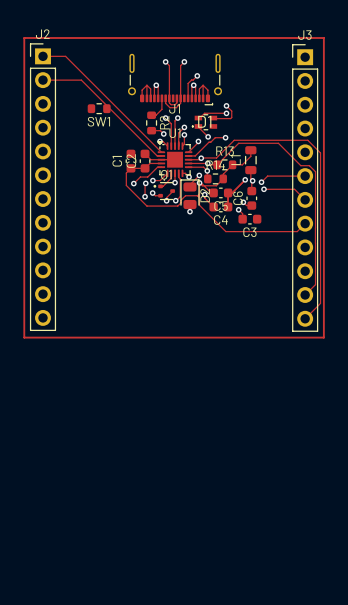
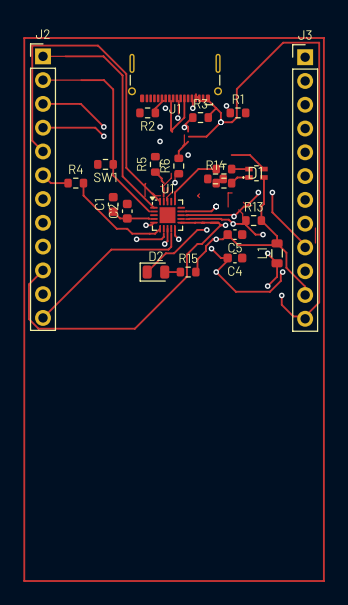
track: (65, 56) (161, 152) -> (65, 56) (103, 56) (122, 75) (122, 176) (153, 207)
track: (165, 61) (169, 65) (169, 102) (175, 104) (176, 98) -> none
via: (165, 61) -> none
track: (184, 61) (180, 65) (180, 103) (176, 107) (169, 107) (165, 103) (165, 98) -> none
via: (184, 61) -> none
track: (197, 75) (188, 83) (188, 98) -> none
via: (197, 75) -> none
track: (81, 80) (157, 155) (161, 155) -> (81, 80) (103, 80) (113, 89) (113, 175) (149, 211)
track: (146, 85) (142, 90) (142, 98) -> none
track: (146, 85) (150, 89) (150, 98) -> none
track: (146, 85) (146, 98) -> none
via: (156, 85) -> none
via: (193, 85) -> none
track: (203, 85) (203, 98) -> (178, 100) (178, 113)
track: (203, 85) (207, 90) (207, 98) -> none
track: (203, 85) (199, 89) (199, 98) -> none
track: none -> (195, 94) (200, 100) (208, 100) (220, 112) (220, 122)
track: (154, 98) (154, 87) (156, 85) (158, 87) (158, 98) -> none
track: (161, 98) (161, 109) (156, 115) (151, 115) -> none
track: (191, 98) (191, 87) (193, 85) (195, 87) (195, 98) -> none
track: none -> (184, 99) (184, 117) (172, 131) (171, 100)
track: none -> (164, 100) (155, 108) (155, 112)
track: none -> (192, 100) (192, 108)
track: none -> (43, 103) (80, 103) (103, 126)
track: (226, 105) (231, 111) (230, 118) (213, 118) -> none
SW1 position: (99, 108) -> (105, 164)
via: none -> (165, 108)
via: none -> (192, 108)
track: none -> (216, 108) (208, 117)
R1: none -> (237, 112)
track: (226, 113) (204, 113) (198, 118) -> none
via: (226, 113) -> none
track: none -> (192, 117) (185, 124) (188, 126) (188, 131)
R3: none -> (200, 117)
track: (165, 118) (171, 123) (171, 146) -> none
via: (165, 118) -> none
track: (177, 118) (175, 120) (175, 146) -> none
R2 rotation: 0° (151, 122) -> 90° clockwise (147, 112)
D1 position: (204, 122) -> (255, 173)
track: none -> (220, 122) (232, 122) (236, 117) (236, 89) (283, 42) (319, 42) (319, 302) (305, 316) (293, 316) (281, 304) (281, 295)
track: none -> (220, 122) (206, 136) (188, 136)
via: none -> (220, 122)
via: none -> (103, 126)
via: none -> (160, 126)
track: (198, 126) (208, 136) -> none
track: none -> (43, 127) (95, 127) (103, 136)
track: (184, 127) (178, 133) (178, 146) -> none
track: (151, 130) (160, 130) (163, 133) -> none
via: (163, 133) -> none
via: (184, 134) -> none
via: none -> (103, 136)
via: (208, 136) -> none
track: (225, 137) (215, 137) (195, 155) (188, 155) -> none
via: (225, 137) -> none
track: (160, 141) (167, 146) -> none
track: none -> (188, 141) (178, 151) (178, 158)
track: (198, 141) (188, 152) -> none
via: (198, 141) -> none
track: (250, 150) (250, 156) (242, 164) (232, 164) (223, 174) (223, 178) (216, 185) (202, 185) (199, 182) -> none
track: none -> (43, 151) (32, 140) (32, 45) (98, 45) (126, 73) (126, 167) (160, 201)
track: (145, 153) (150, 159) (175, 159) -> none
via: none -> (188, 155)
track: none -> (231, 155) (249, 155) (263, 169)
via: (201, 158) -> none
U1 position: (174, 159) -> (167, 214)
track: (188, 159) (216, 157) (234, 140) (307, 140) (320, 152) (320, 303) (305, 318) -> none
L1 position: (250, 160) -> (277, 253)
C1 position: (131, 161) -> (113, 204)
C2 position: (145, 161) -> (127, 211)
track: (161, 163) (149, 163) (145, 168) -> none
track: (188, 163) (217, 164) (238, 143) (278, 143) (300, 165) (309, 165) (315, 171) (315, 227) -> none
via: (207, 163) -> none
R5: none -> (155, 164)
R13 position: (224, 164) -> (253, 220)
R6: none -> (178, 166)
track: (161, 167) (157, 167) (147, 177) (140, 177) (133, 183) -> none
track: (188, 167) (203, 167) (207, 170) (207, 178) -> none
track: (145, 168) (131, 168) (126, 173) (126, 185) (146, 206) (177, 206) (185, 195) (199, 195) -> none
track: none -> (216, 169) (198, 169) (175, 192) (175, 201)
part: none -> (223, 169)
track: none -> (231, 169) (248, 169)
via: (207, 170) -> none
track: (250, 170) (251, 191) -> none
track: none -> (155, 172) (163, 183)
track: (167, 173) (160, 180) (152, 180) -> none
track: (178, 173) (180, 196) (175, 200) -> none
track: (182, 173) (189, 177) -> none
track: none -> (43, 175) (50, 183) (68, 183)
track: (199, 175) (189, 186) -> none
via: (199, 175) -> none
track: (305, 176) (267, 176) (261, 182) -> none
via: (189, 177) -> none
track: none -> (248, 177) (237, 177) (231, 183)
track: none -> (263, 177) (263, 203) (261, 206) (261, 220) (277, 236) (277, 245) (238, 245) (227, 234) (223, 239) (212, 239) (205, 246) (205, 250) (197, 259) (195, 272)
track: (245, 179) (228, 196) -> none
via: (245, 179) -> none
via: (152, 180) -> none
via: (252, 180) -> none
track: (199, 182) (199, 205) (225, 231) (297, 231) (305, 223) -> none
track: (199, 182) (213, 192) -> none
via: (199, 182) -> none
via: (261, 182) -> none
R4: none -> (75, 183)
track: none -> (83, 183) (83, 195) (116, 228) (127, 228) (132, 233) (155, 233) (160, 228)
via: (133, 183) -> none
via: (145, 183) -> none
part: none -> (223, 183)
track: none -> (163, 187) (163, 196)
track: none -> (167, 187) (167, 192)
via: (263, 189) -> none
track: (264, 189) (294, 189) (305, 199) -> none
Q1: (164, 191) -> none
C5 position: (220, 192) -> (234, 234)
track: none -> (258, 192) (234, 216)
via: none -> (258, 192)
track: none -> (272, 192) (272, 212) (305, 245)
via: none -> (272, 192)
via: (152, 193) -> none
D2 rotation: 0° (189, 194) -> 90° counterclockwise (154, 272)
D2 position: (189, 194) -> (154, 272)
track: (204, 194) (204, 198) (213, 206) -> none
via: (204, 194) -> none
via: (145, 196) -> none
C6: (251, 198) -> none
via: (166, 200) -> none
via: (175, 200) -> none
via: (243, 202) -> none
track: none -> (216, 206) (211, 211) (185, 211)
via: none -> (216, 206)
C4 position: (220, 206) -> (234, 258)
via: (238, 209) -> none
track: none -> (113, 211) (120, 218) (149, 218)
via: (189, 211) -> none
track: none -> (185, 215) (234, 216)
via: none -> (234, 216)
track: none -> (185, 219) (228, 219) (233, 223) (242, 223) (245, 220) (245, 225) (255, 234) (263, 234)
C3: (249, 219) -> none
track: none -> (153, 222) (151, 225) (145, 225)
track: none -> (181, 222) (195, 222)
track: none -> (195, 222) (218, 222) (220, 225)
via: none -> (233, 223)
via: none -> (145, 225)
track: none -> (225, 225) (220, 225) (201, 243) (197, 243) (186, 254) (186, 276) (134, 328) (38, 328) (28, 319) (28, 284) (43, 270)
via: none -> (225, 225)
track: none -> (167, 228) (167, 241) (164, 243)
track: none -> (175, 228) (175, 235) (178, 239)
track: none -> (206, 229) (197, 229) (174, 253) (165, 253) (147, 272)
via: none -> (206, 229)
track: none -> (163, 233) (161, 239) (136, 239)
track: none -> (171, 233) (171, 246) (168, 249) (111, 249) (43, 317)
via: none -> (263, 234)
via: none -> (136, 239)
via: none -> (178, 239)
via: none -> (216, 239)
via: none -> (164, 243)
track: none -> (277, 243) (286, 252) (286, 267) (305, 286) (305, 292)
track: (315, 243) (315, 284) (305, 294) -> none
track: none -> (211, 248) (220, 258) (227, 258) (227, 260) (216, 272) (235, 291) (270, 291) (280, 280) (282, 272)
via: none -> (211, 248)
track: none -> (267, 253) (277, 263) (277, 276) (267, 286)
via: none -> (267, 253)
track: none -> (164, 272) (180, 272)
R15: none -> (188, 272)
via: none -> (216, 272)
via: none -> (282, 272)
via: none -> (267, 286)
via: none -> (281, 295)
track: (24, 337) (323, 337) -> (24, 337) (24, 581) (323, 581) (323, 337)

